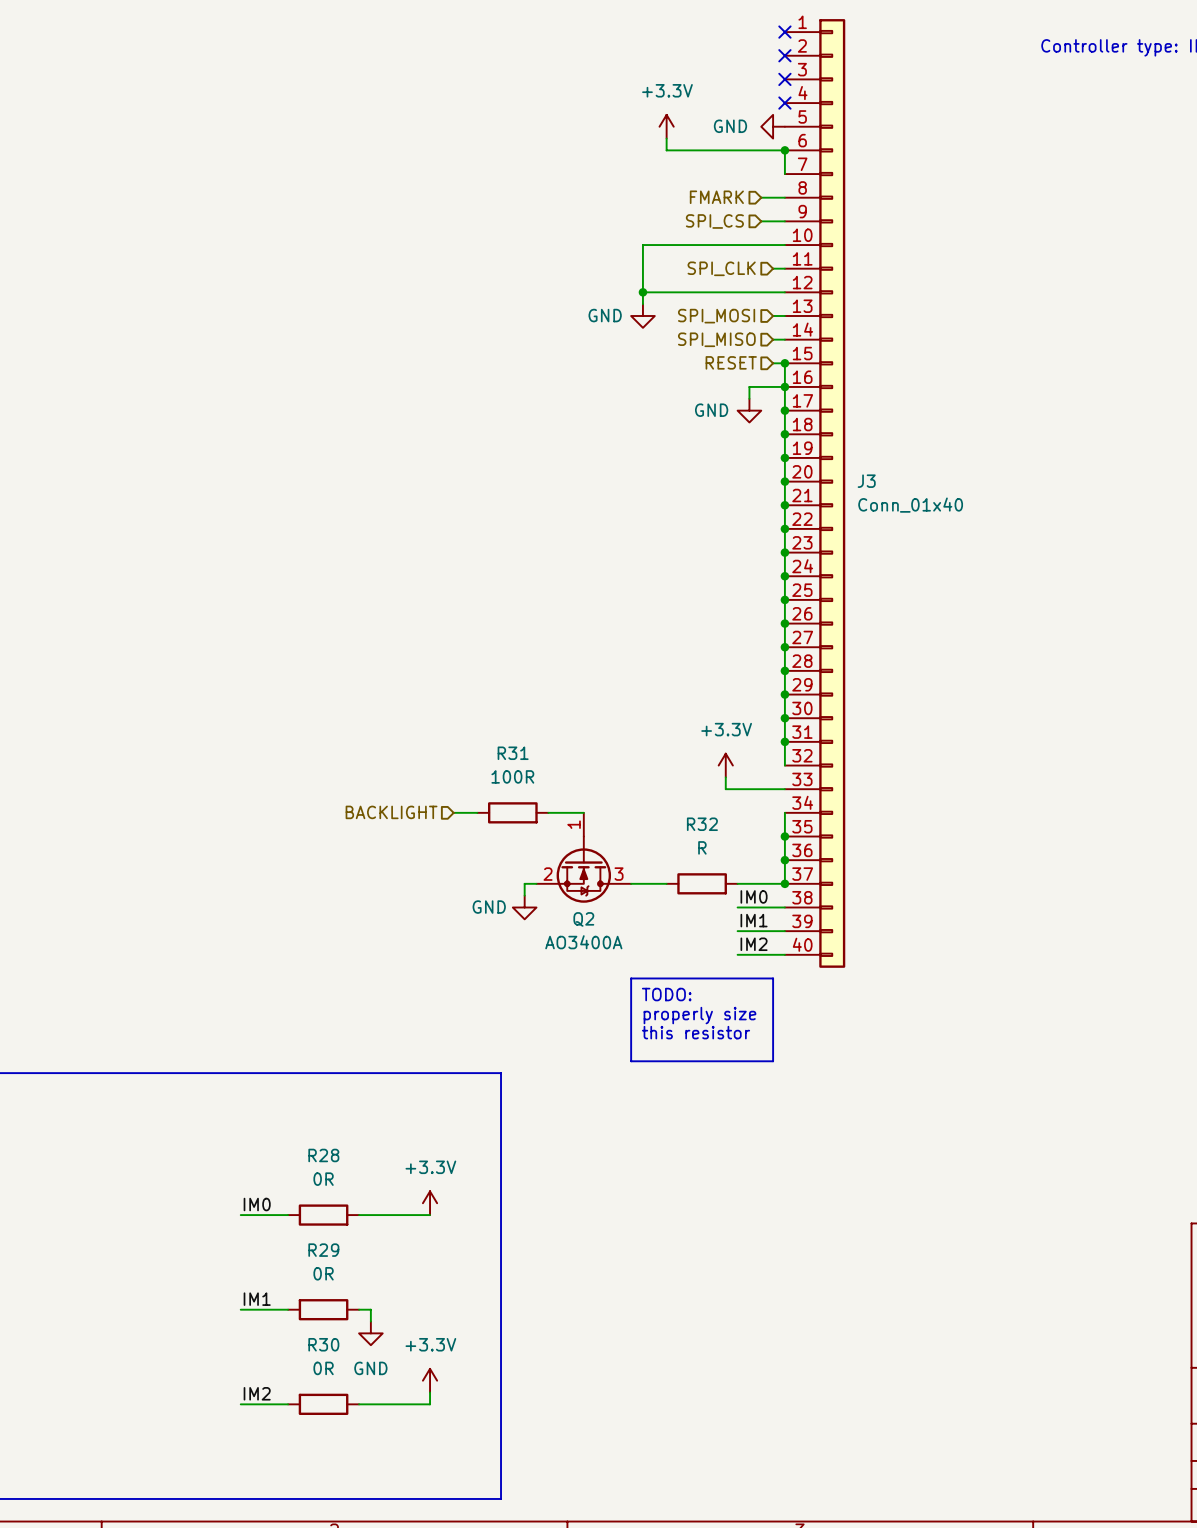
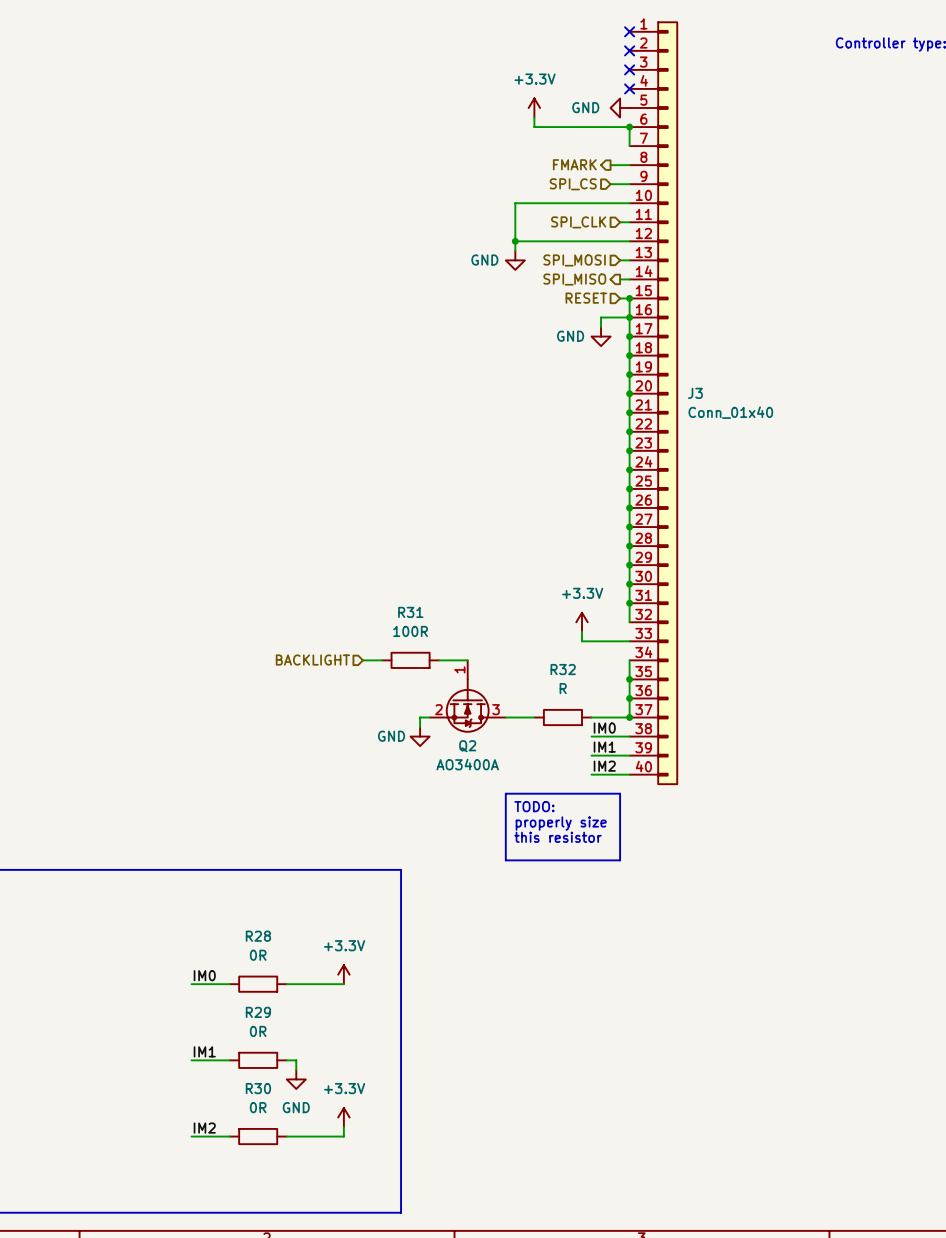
hierarchical label shape: input (716, 197) -> output (574, 164)
hierarchical label shape: input (716, 339) -> output (574, 279)

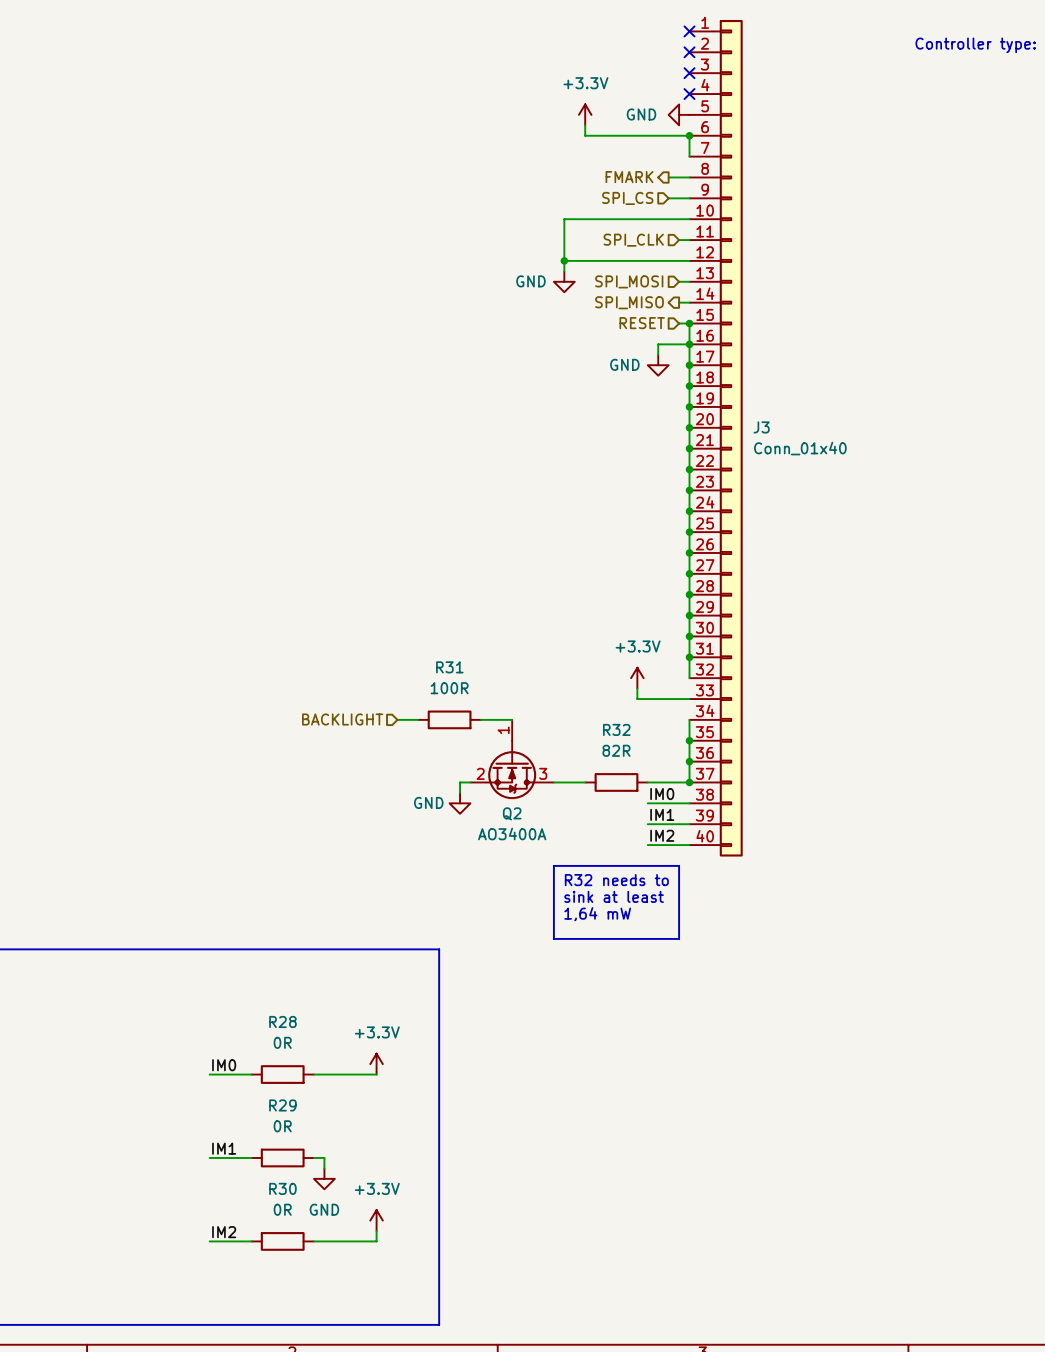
R32 value: R (563, 688) -> 82R (616, 750)
text: TODO: (534, 806) -> R32 needs to (616, 880)
text: properly size (561, 823) -> sink at least (614, 896)
text: this resistor (558, 837) -> 1,64 mW (597, 914)

